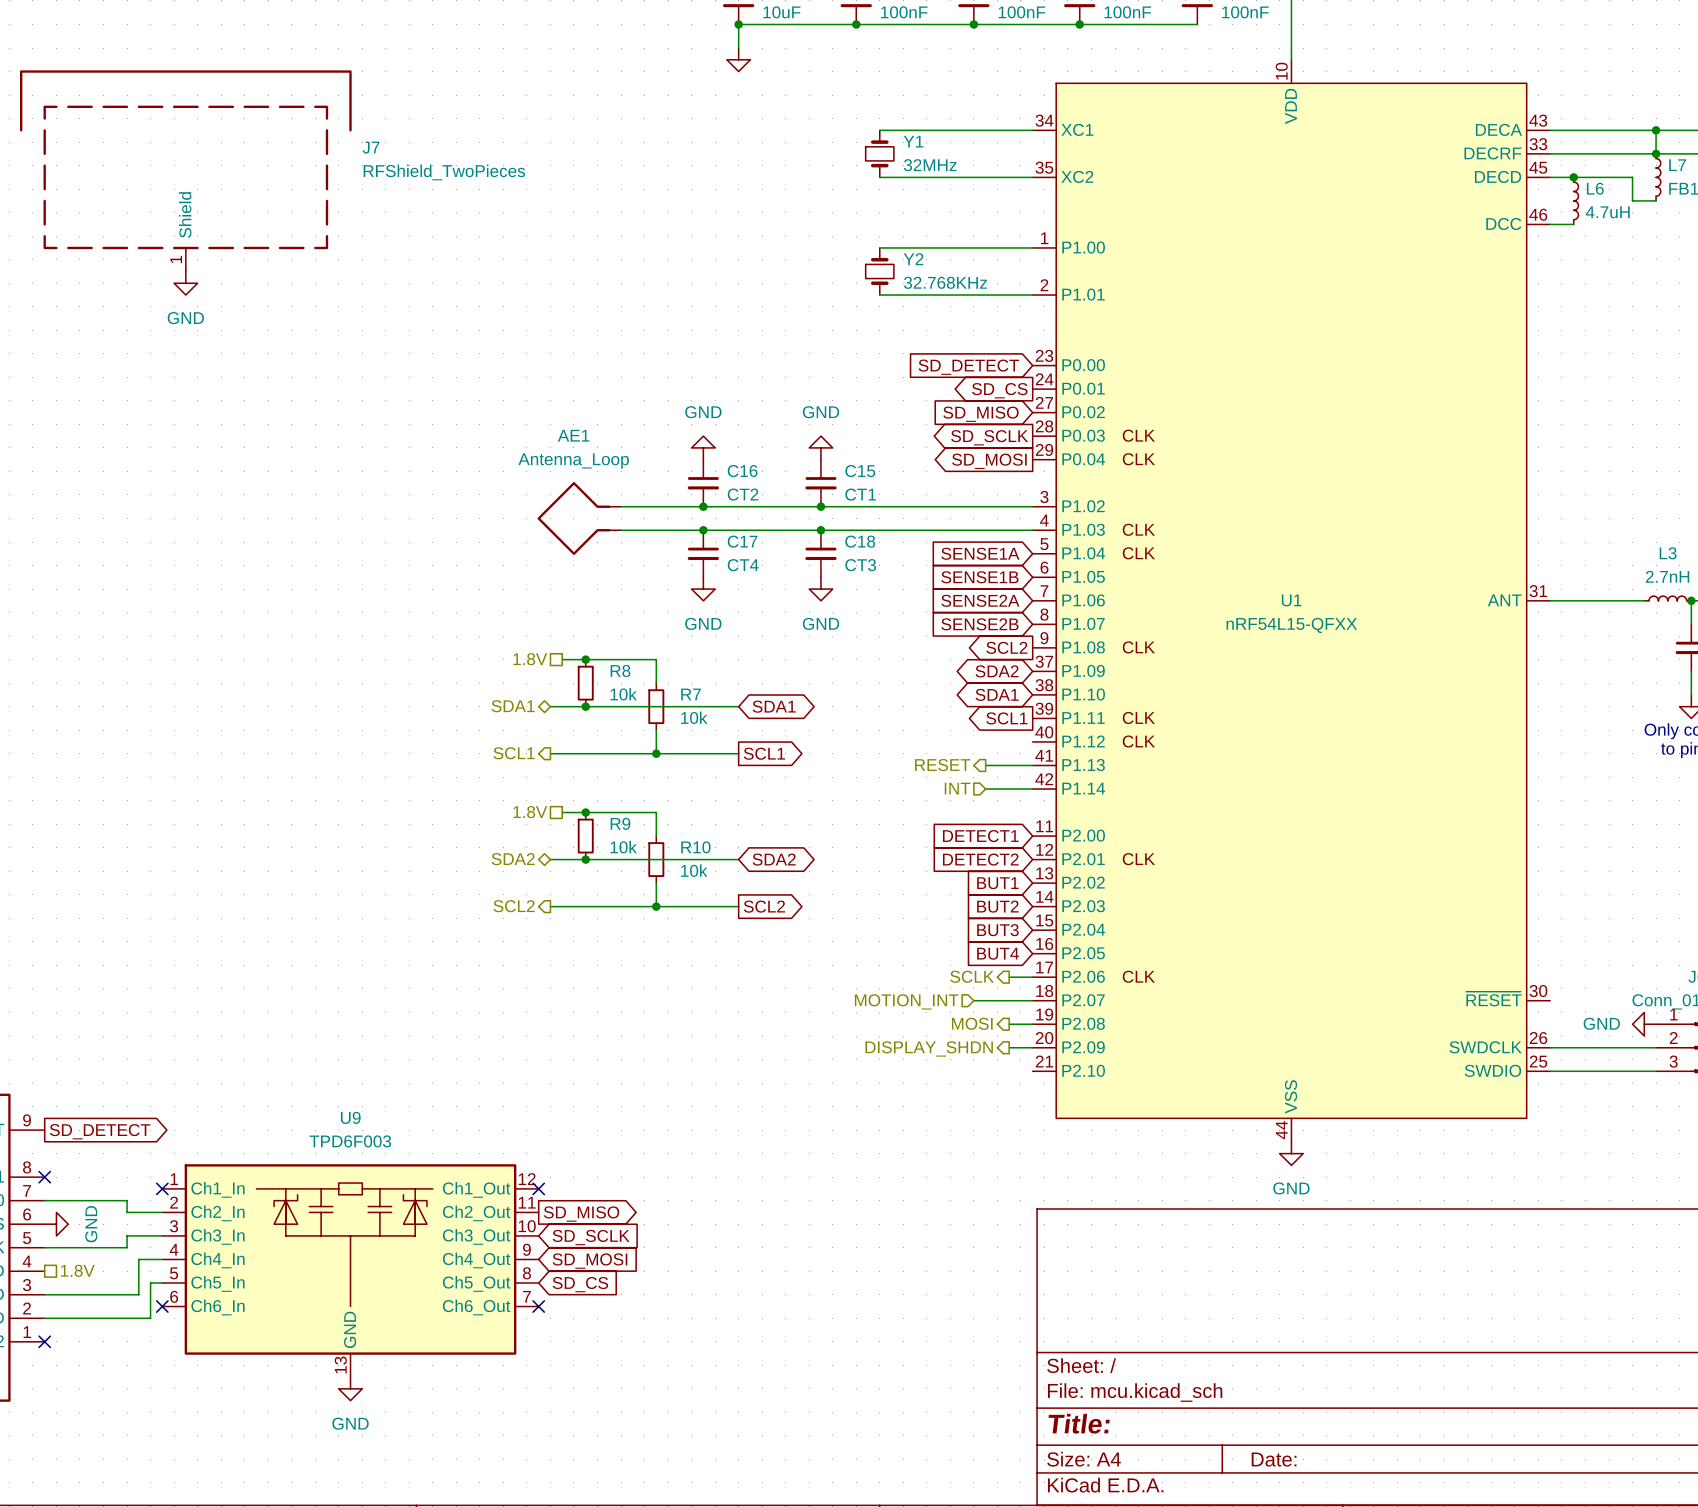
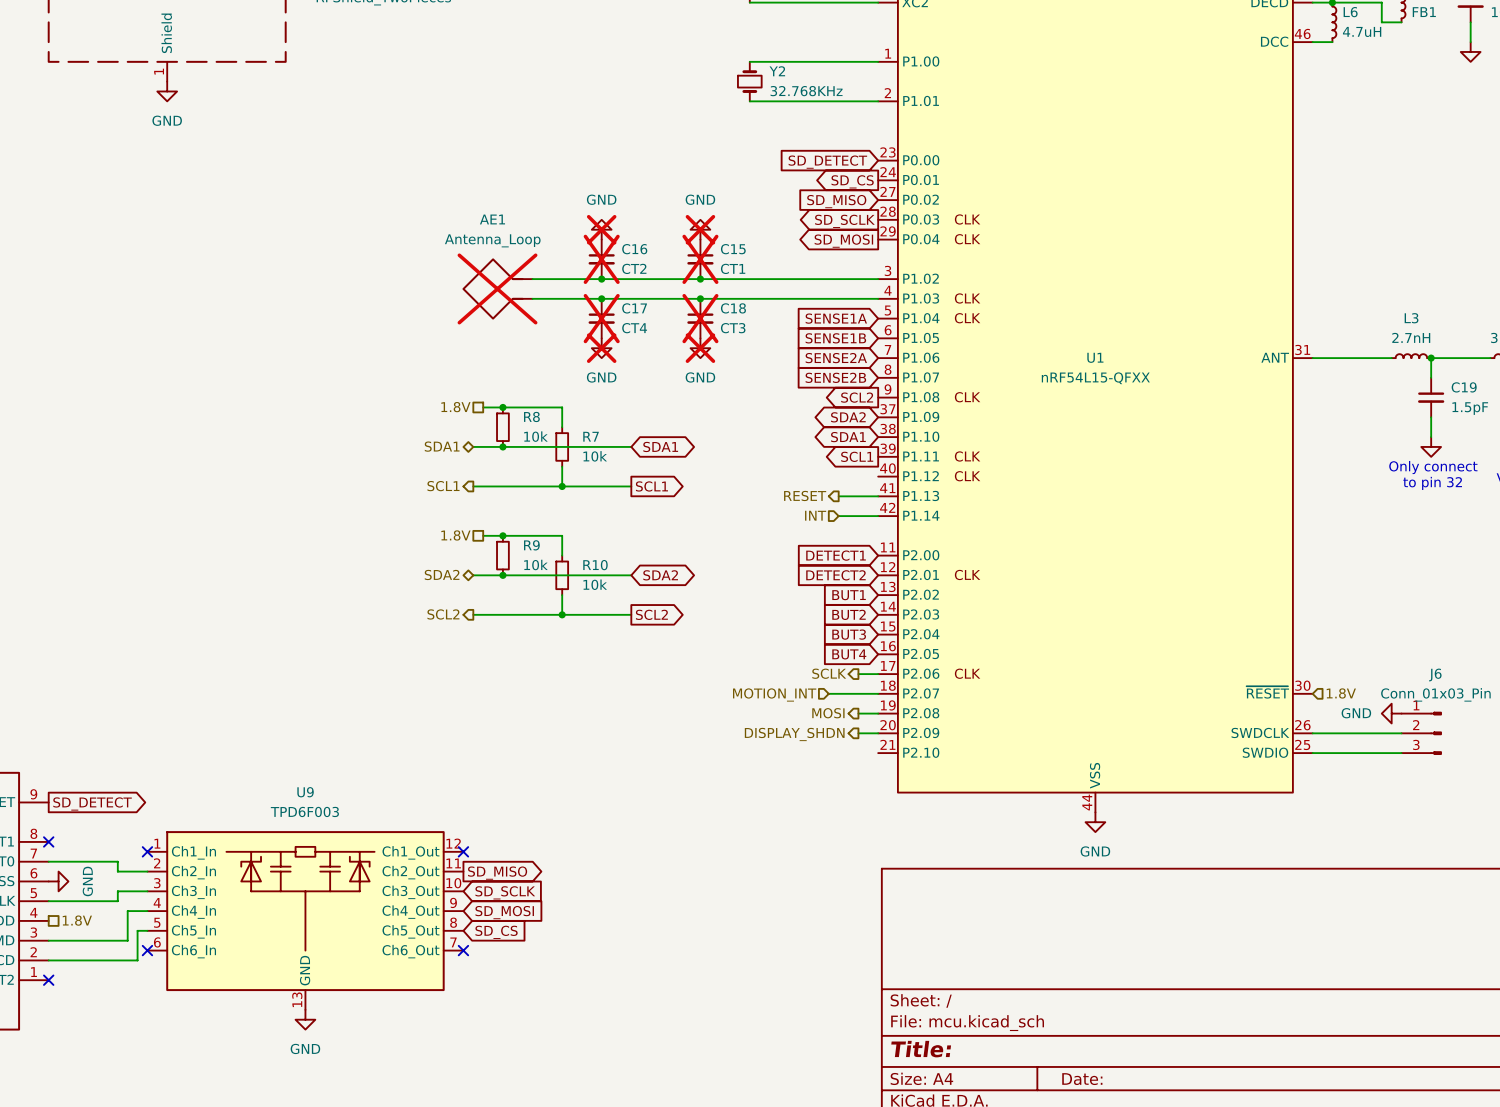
power symbol do-not-place cross: none -> (601, 229)
power symbol do-not-place cross: none -> (700, 229)
C16 do-not-place cross: none -> (601, 259)
C15 do-not-place cross: none -> (700, 259)
AE1 do-not-place cross: none -> (497, 288)
C17 do-not-place cross: none -> (601, 318)
C18 do-not-place cross: none -> (700, 318)
power symbol do-not-place cross: none -> (601, 348)
power symbol do-not-place cross: none -> (700, 348)
hierarchical label: none -> 1.8V (1341, 693)

